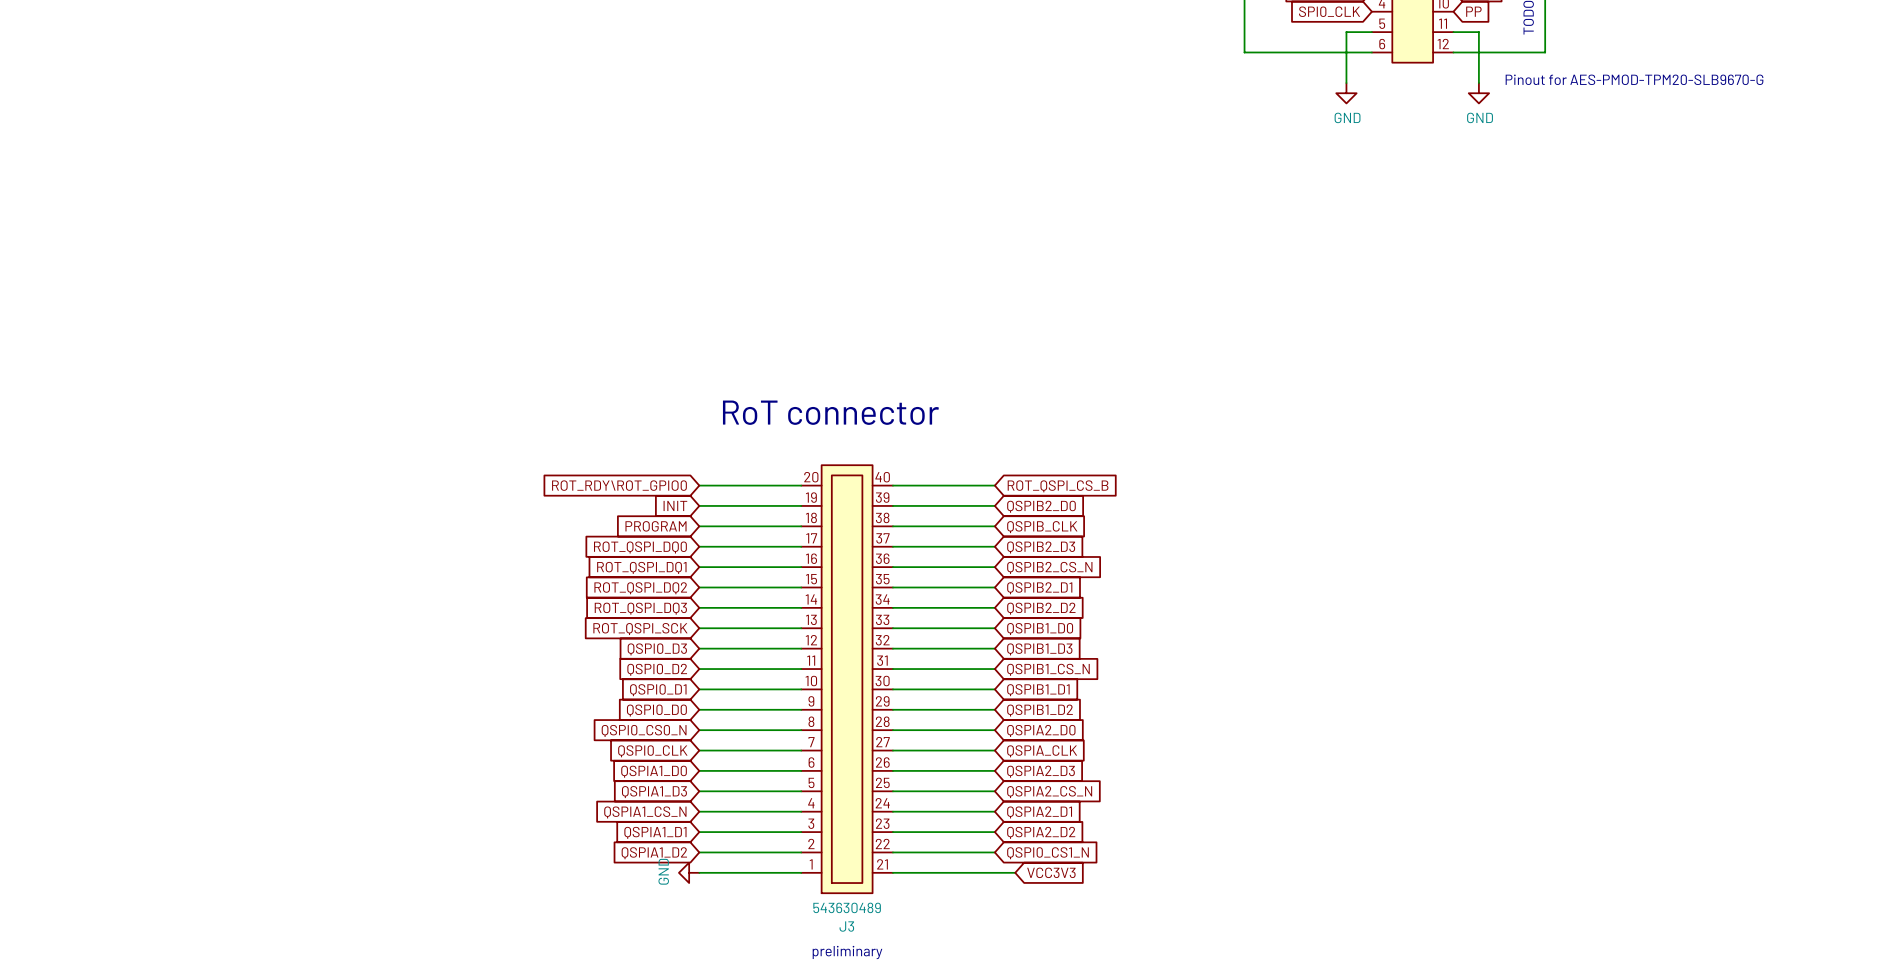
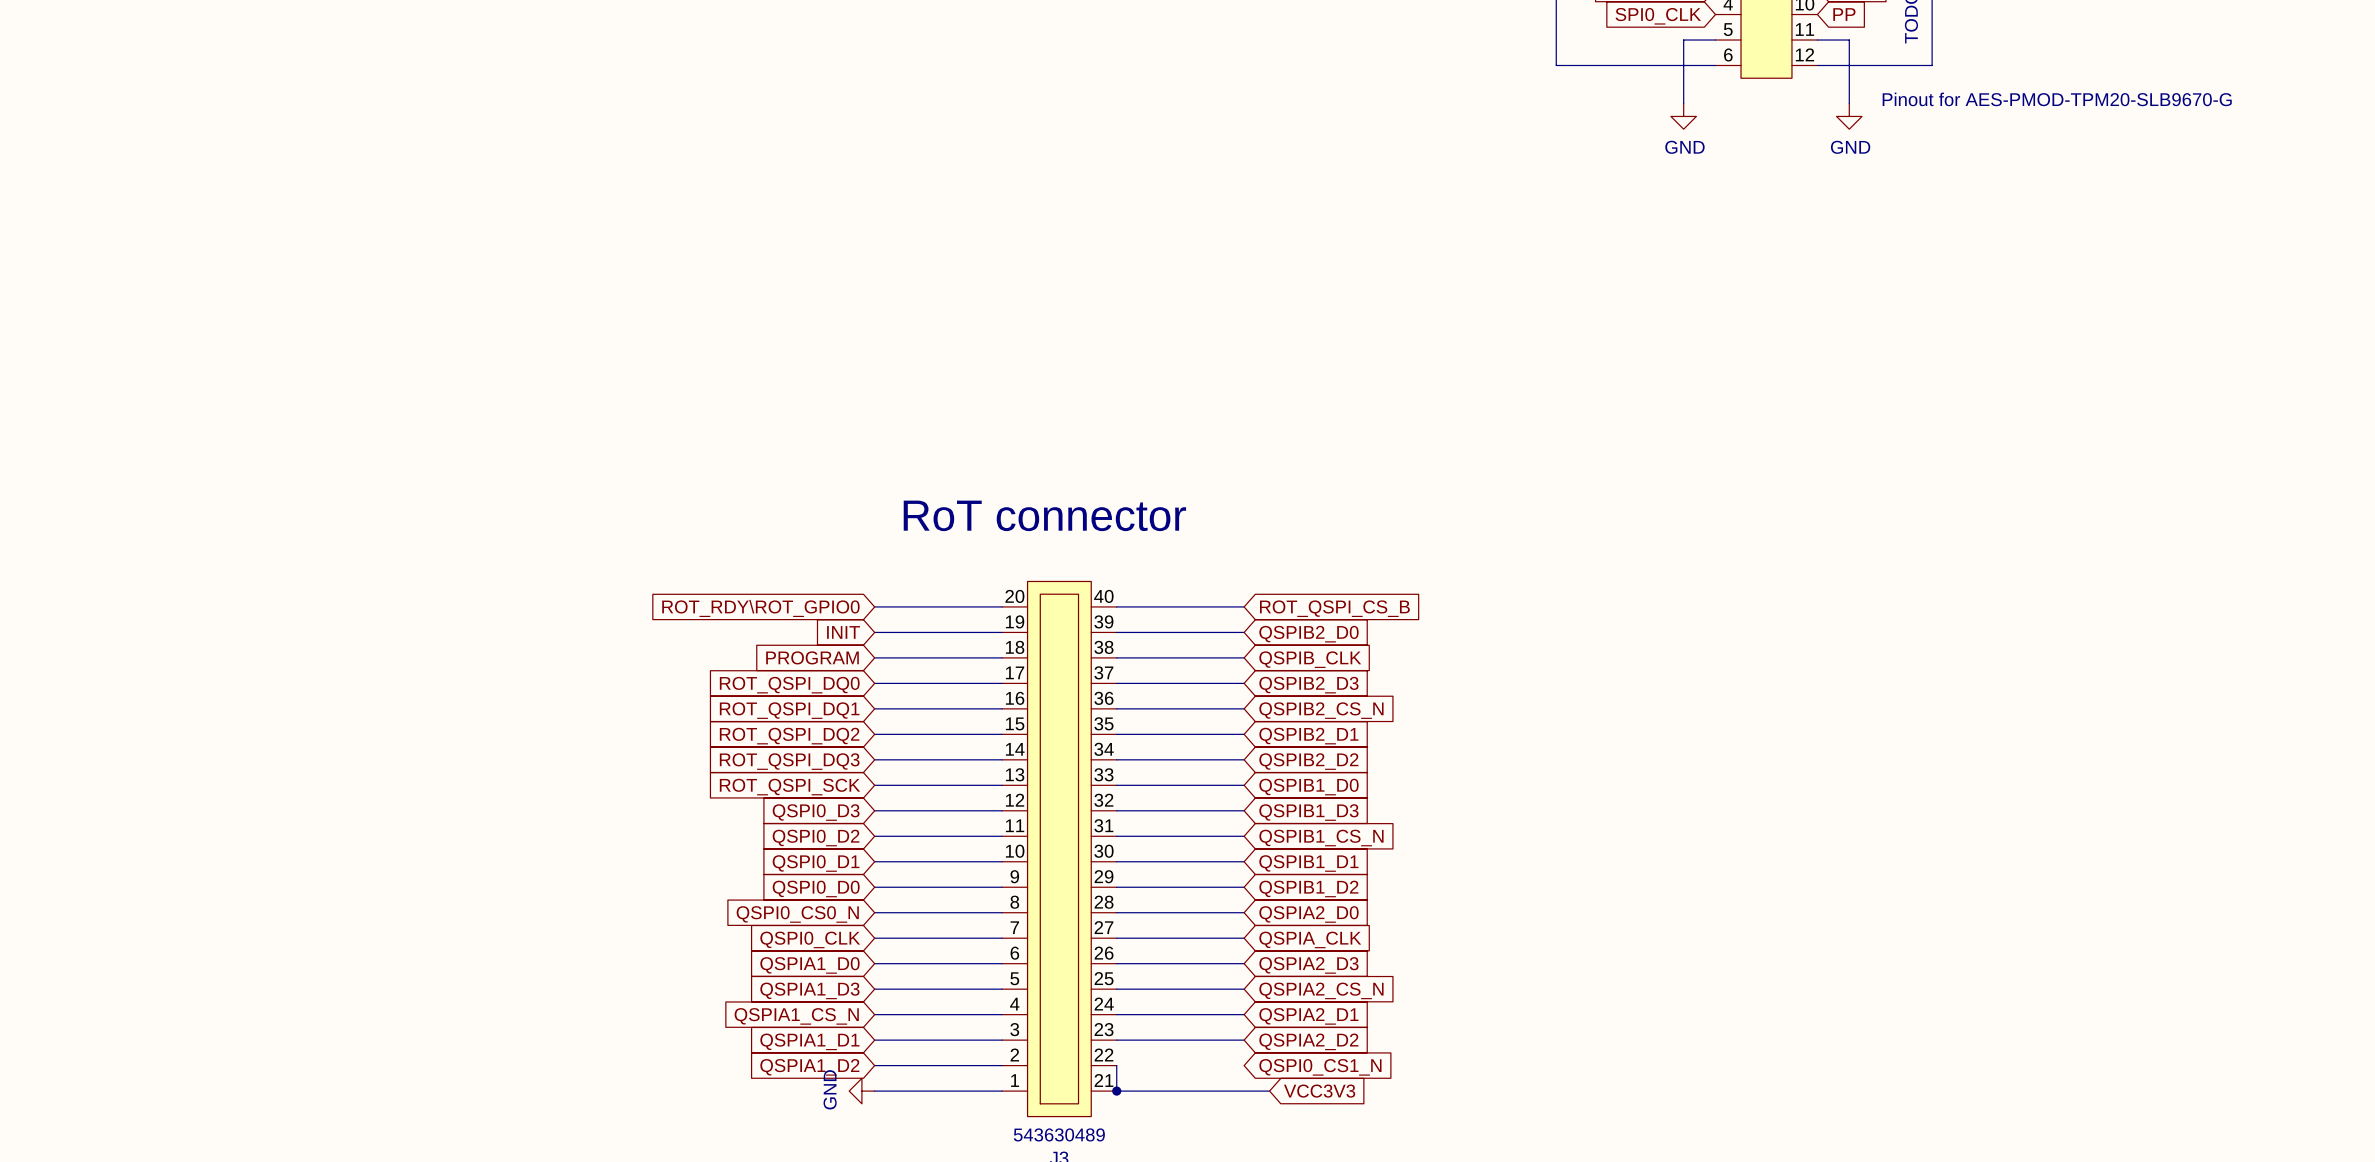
wire: (892, 852) (994, 852) -> (1116, 1065) (1116, 1091)
junction: none -> (1116, 1091)

